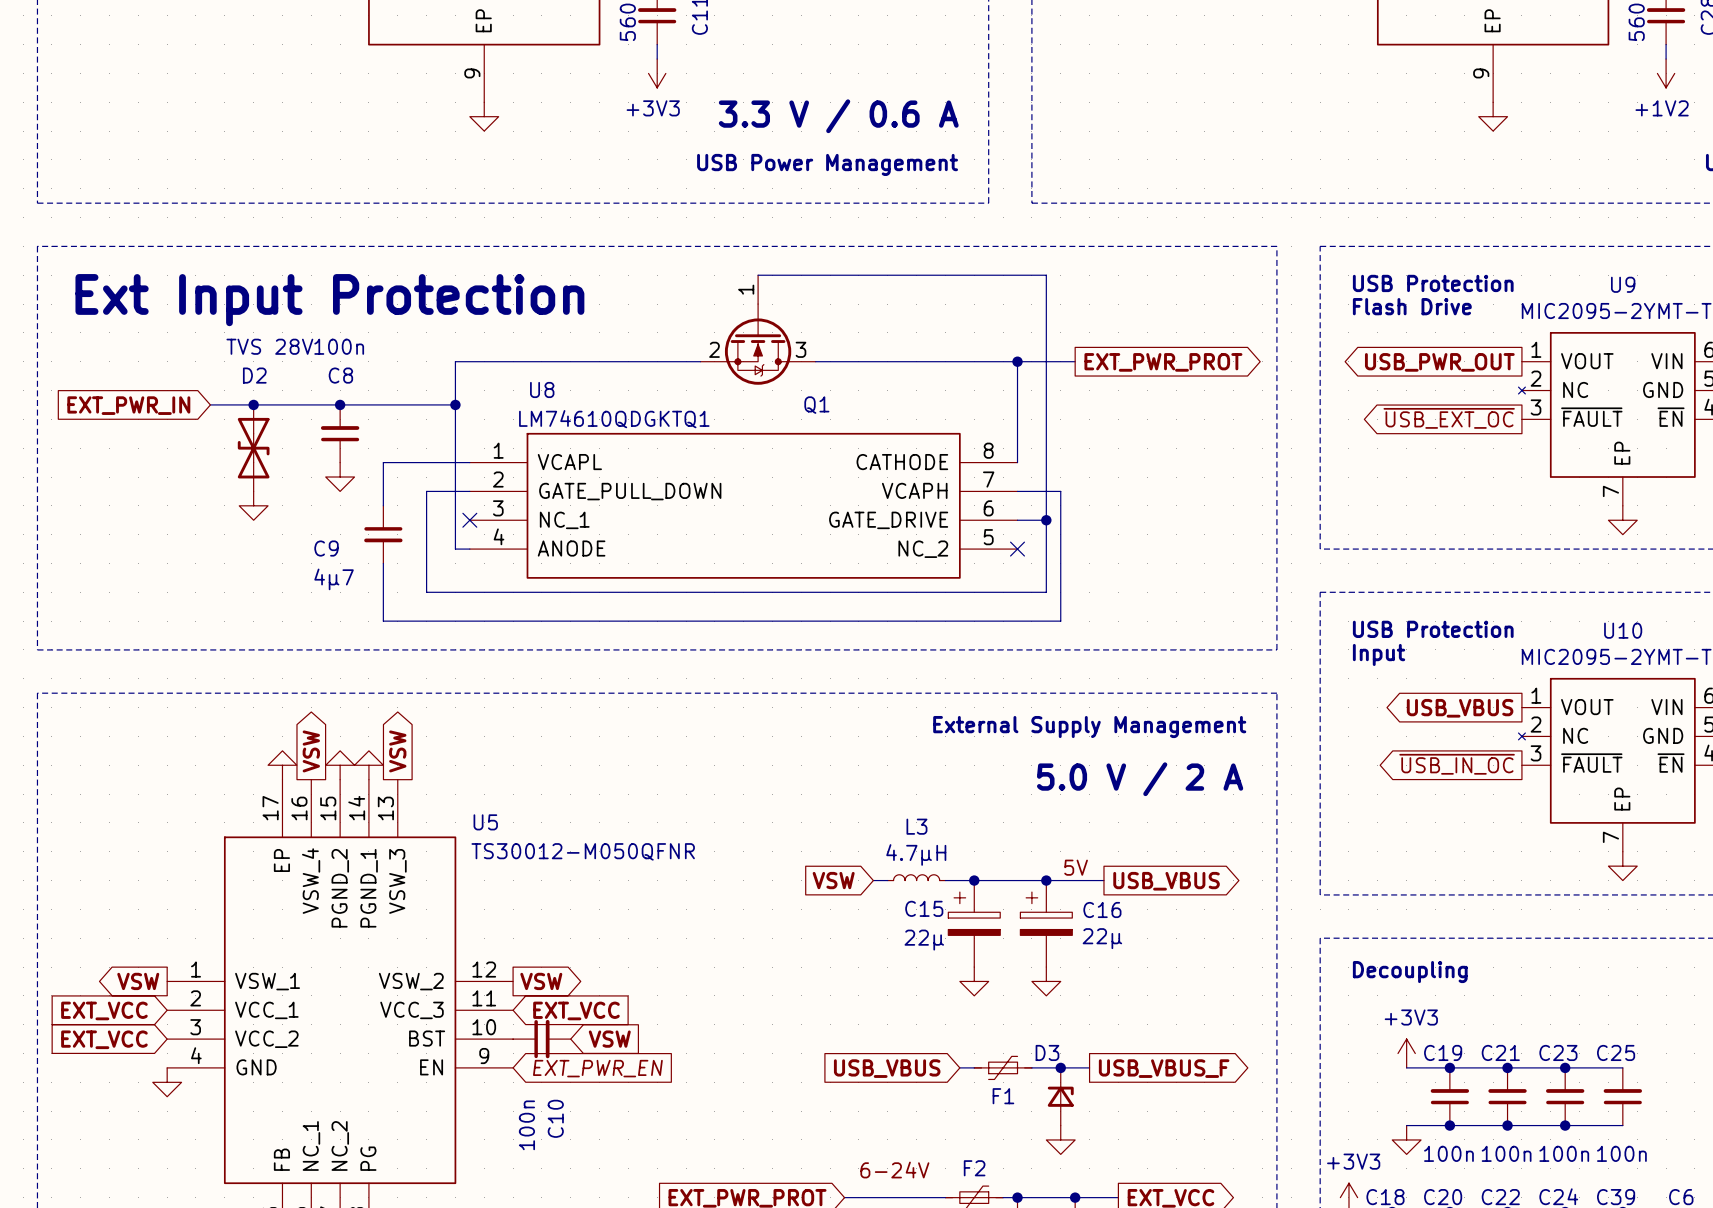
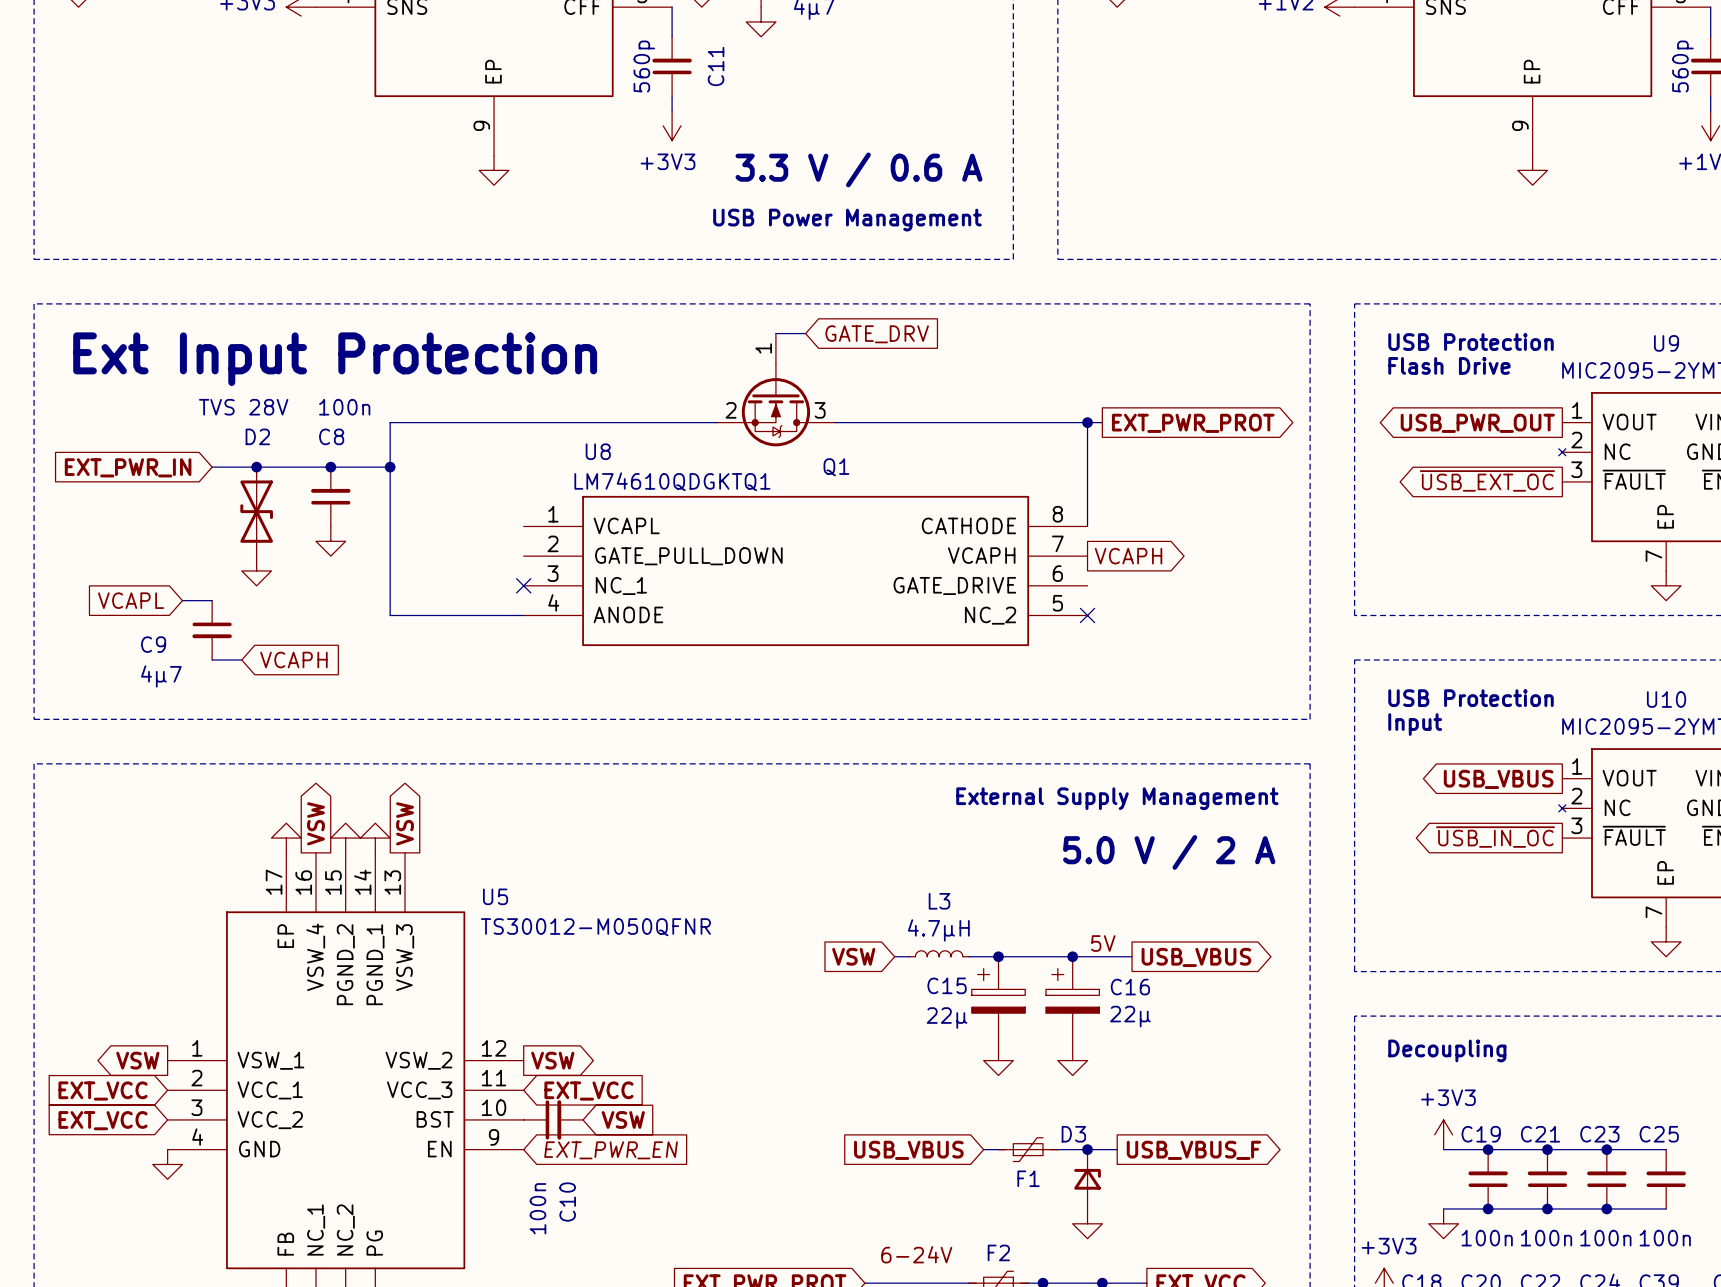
wire: (786, 275) (1046, 275) (1046, 592) (426, 592) (426, 491) (469, 491) -> none
global label: none -> GATE_DRV (877, 334)
D2 value position: TVS 28V (269, 346) -> TVS 28V (243, 407)
wire: (455, 361) (455, 549) -> (390, 570) (390, 615) (464, 615)
wire: (1017, 361) (1017, 462) -> (1087, 422) (1087, 526)
junction position: (1017, 361) -> (1087, 422)
junction position: (340, 404) -> (330, 467)
wire: (383, 404) (455, 404) -> none
junction: none -> (390, 467)
junction: (455, 404) -> none
C8 position: (340, 433) -> (330, 496)
wire: (383, 462) (469, 462) -> (390, 526) (390, 422) (464, 422)
power symbol position: (340, 477) -> (330, 541)
wire: (1017, 491) (1060, 491) (1060, 621) (383, 621) (383, 563) -> none
global label: none -> VCAPH (1128, 556)
U8 position: (743, 505) -> (805, 570)
no-connect mark position: (469, 520) -> (523, 585)
junction: (1046, 520) -> none
global label: none -> VCAPL (131, 600)
wire: none -> (182, 600) (212, 600)
C9 position: (383, 534) -> (212, 630)
no-connect mark position: (1017, 549) -> (1087, 615)
wire: none -> (212, 660) (241, 660)
global label: none -> VCAPH (293, 660)

